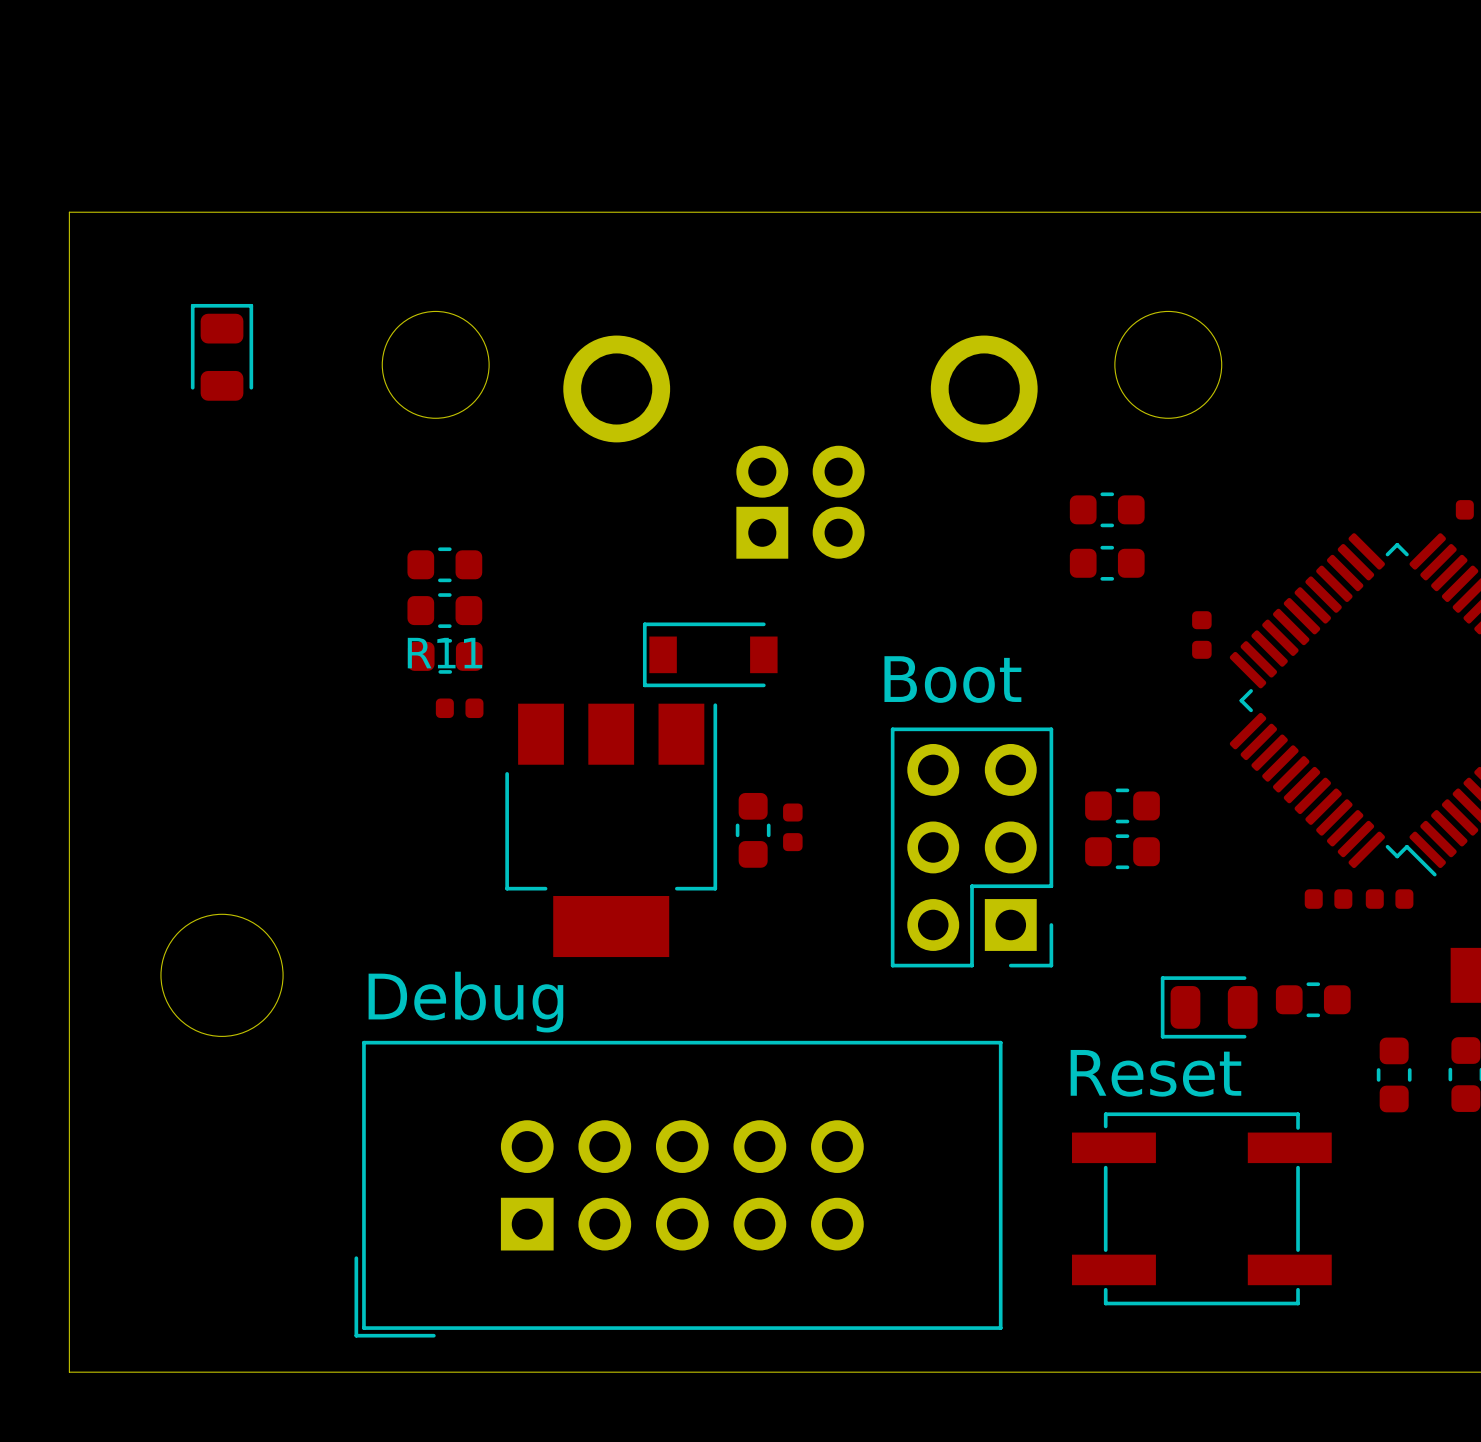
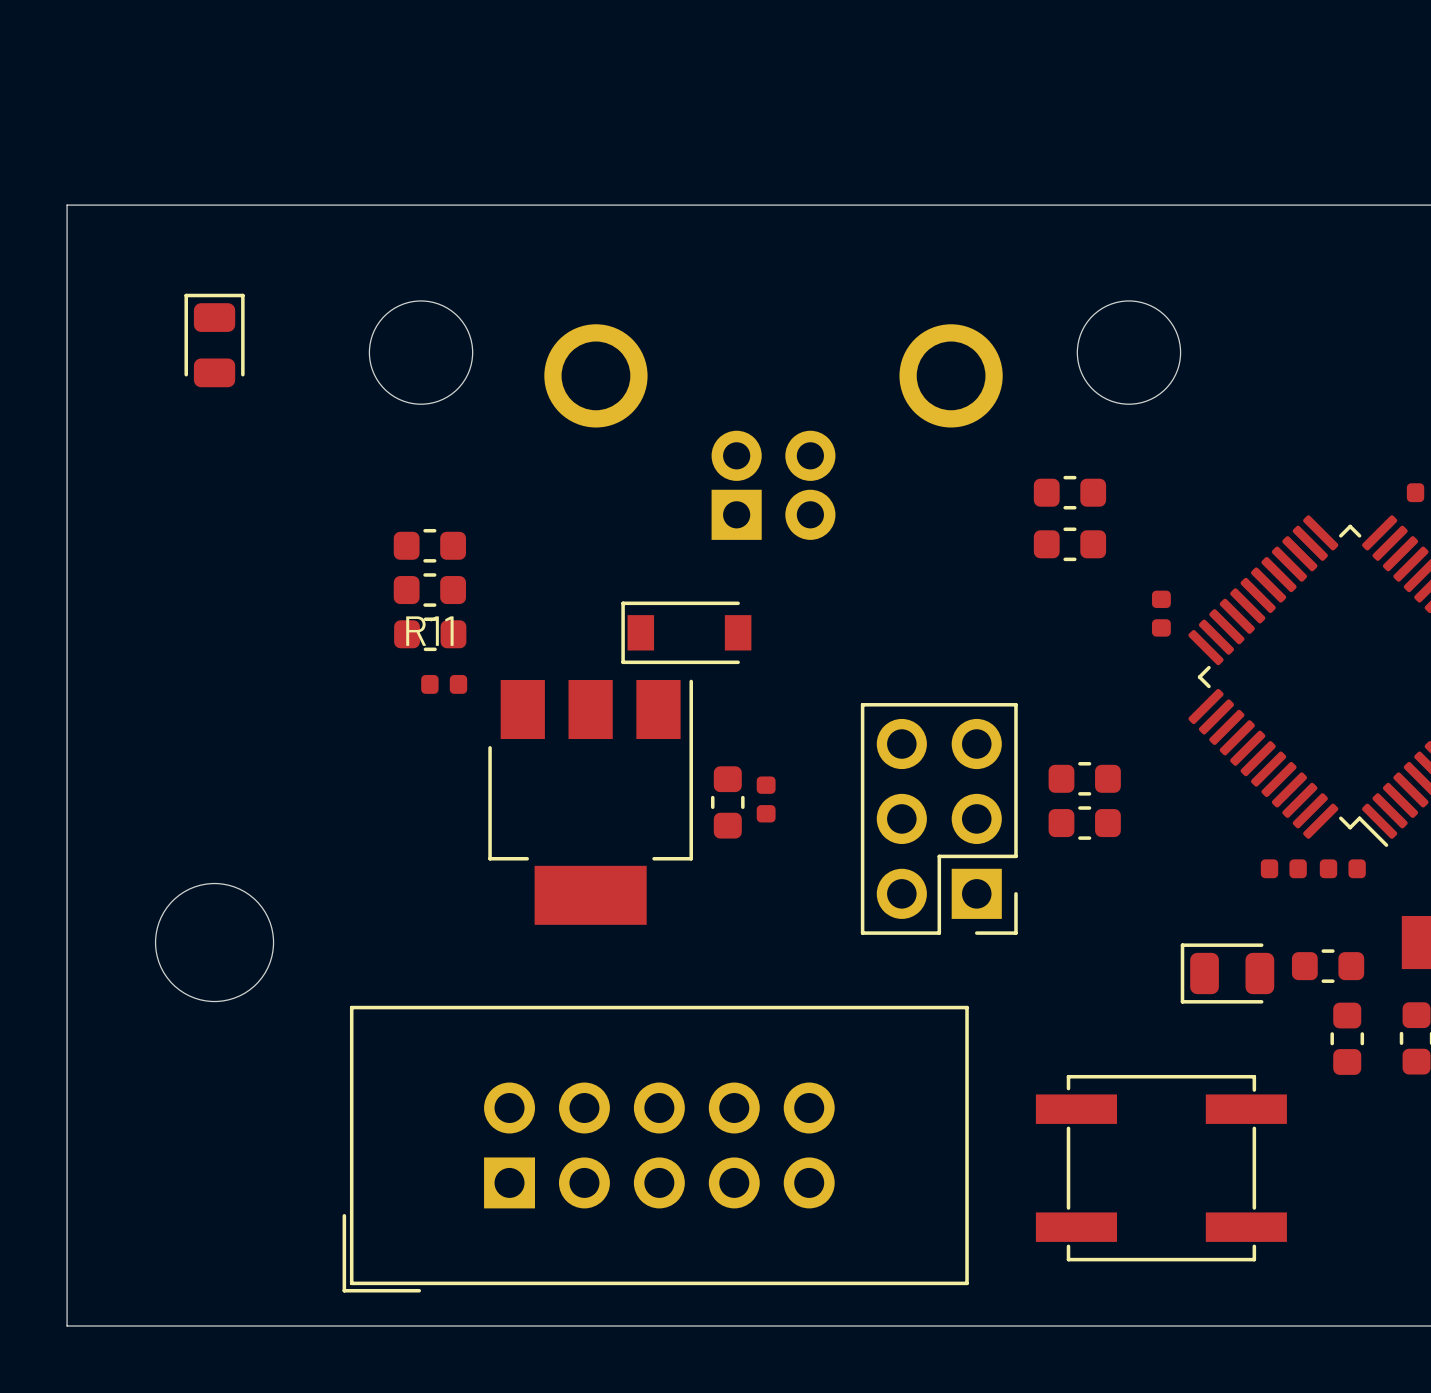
text: Boot (952, 679) -> none
part position: (1313, 999) -> (1328, 966)
text: Debug (465, 1002) -> none
part position: (1209, 1007) -> (1227, 973)
text: Reset (1155, 1073) -> none

